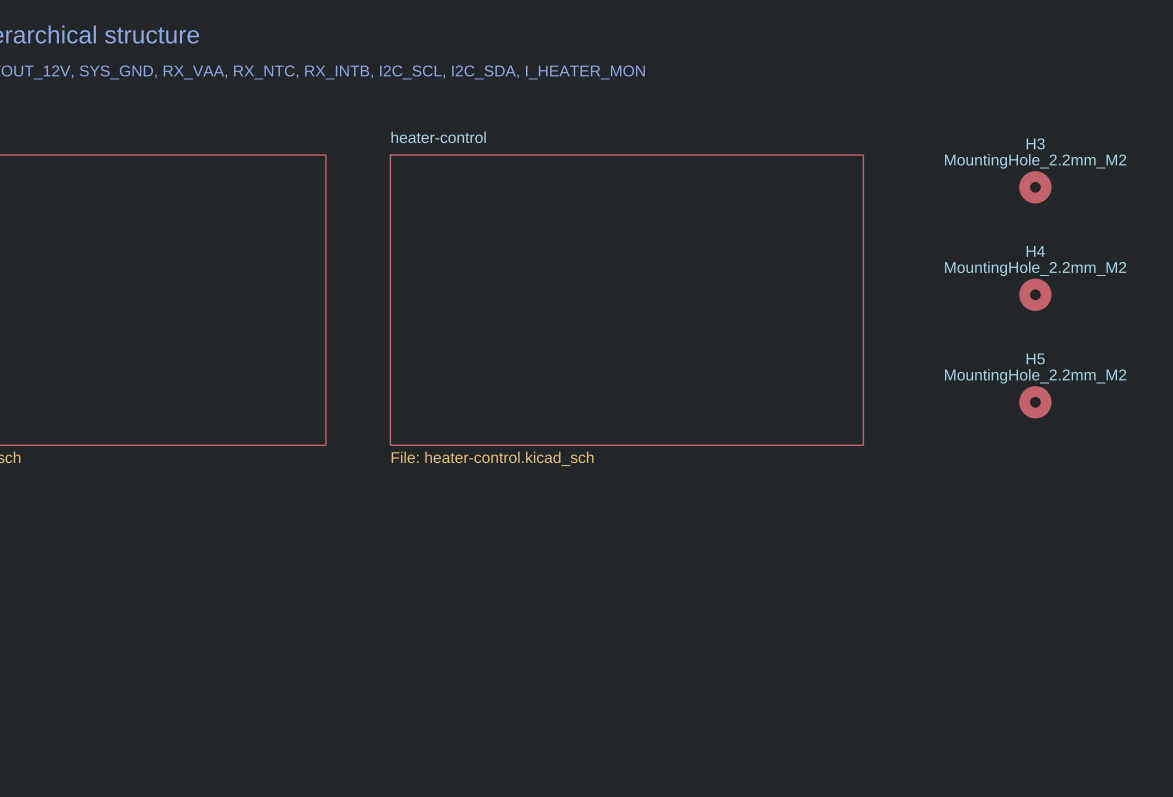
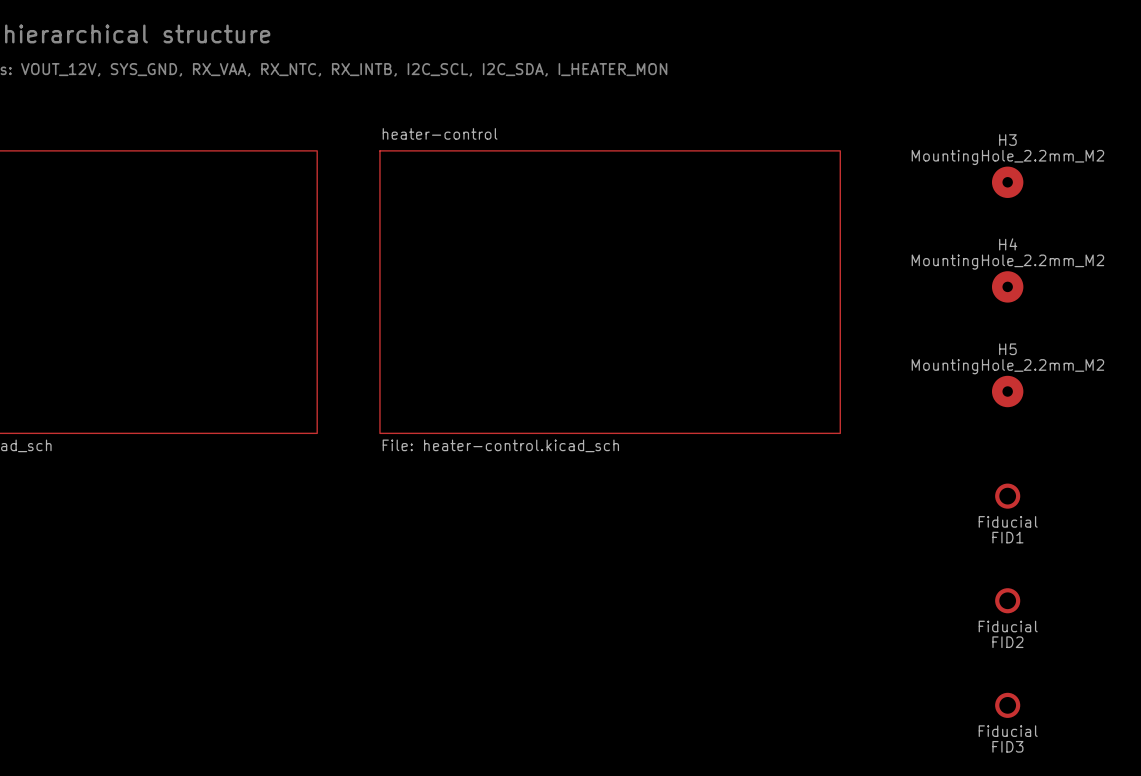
FID1: none -> Fiducial (1007, 496)
FID2: none -> Fiducial (1007, 600)
FID3: none -> Fiducial (1007, 705)

